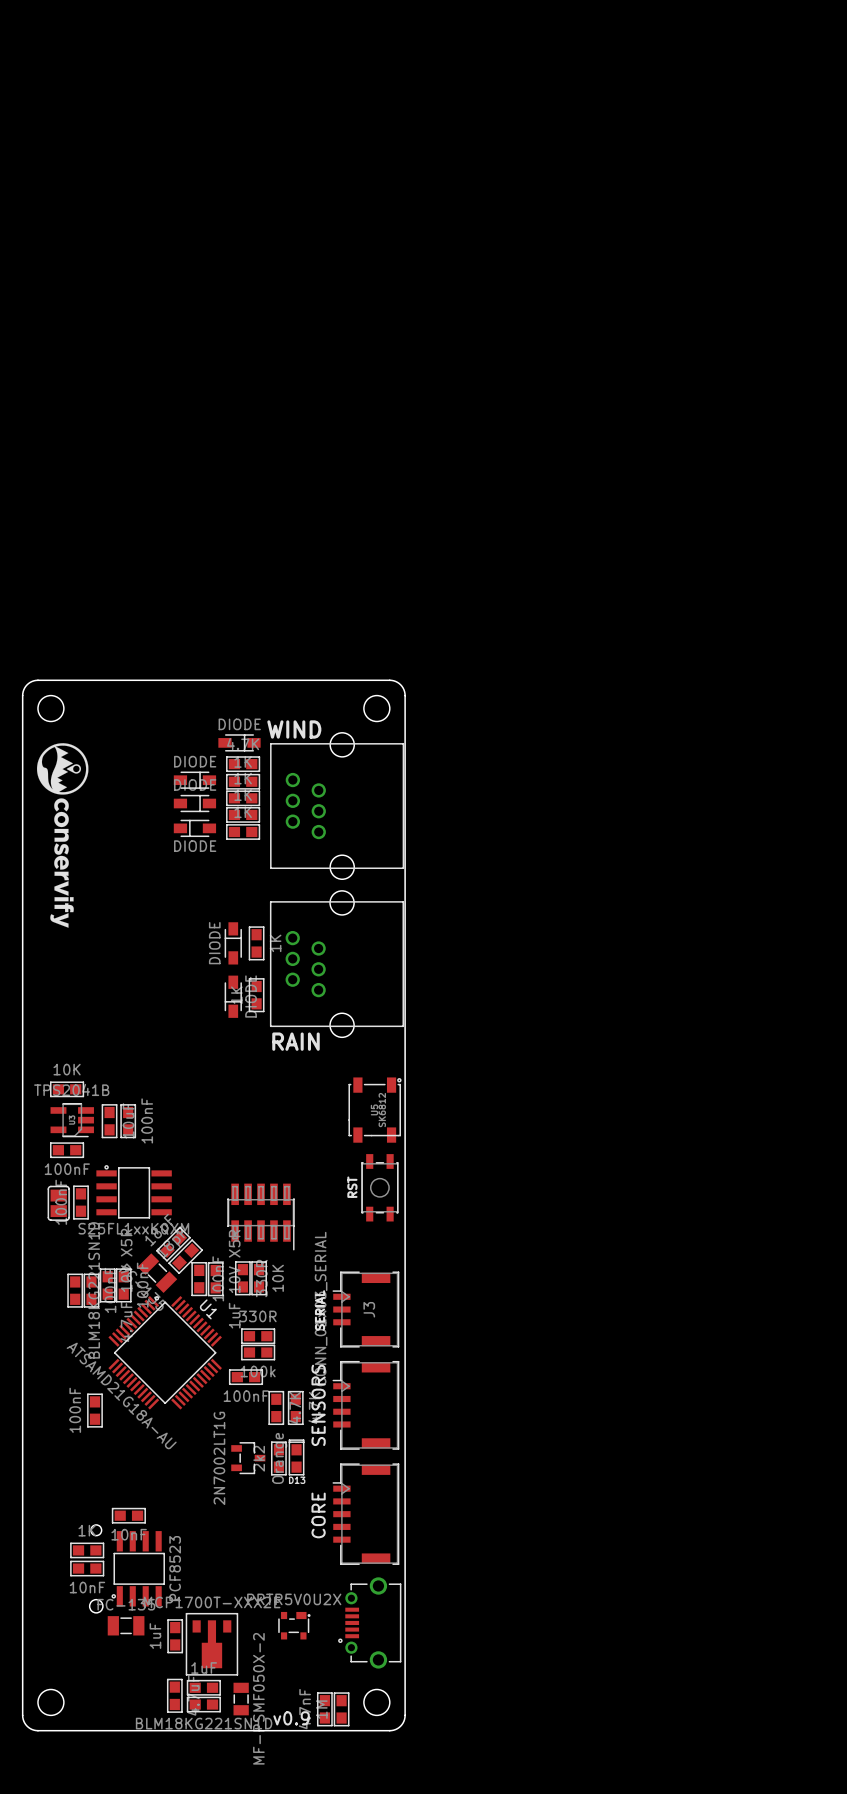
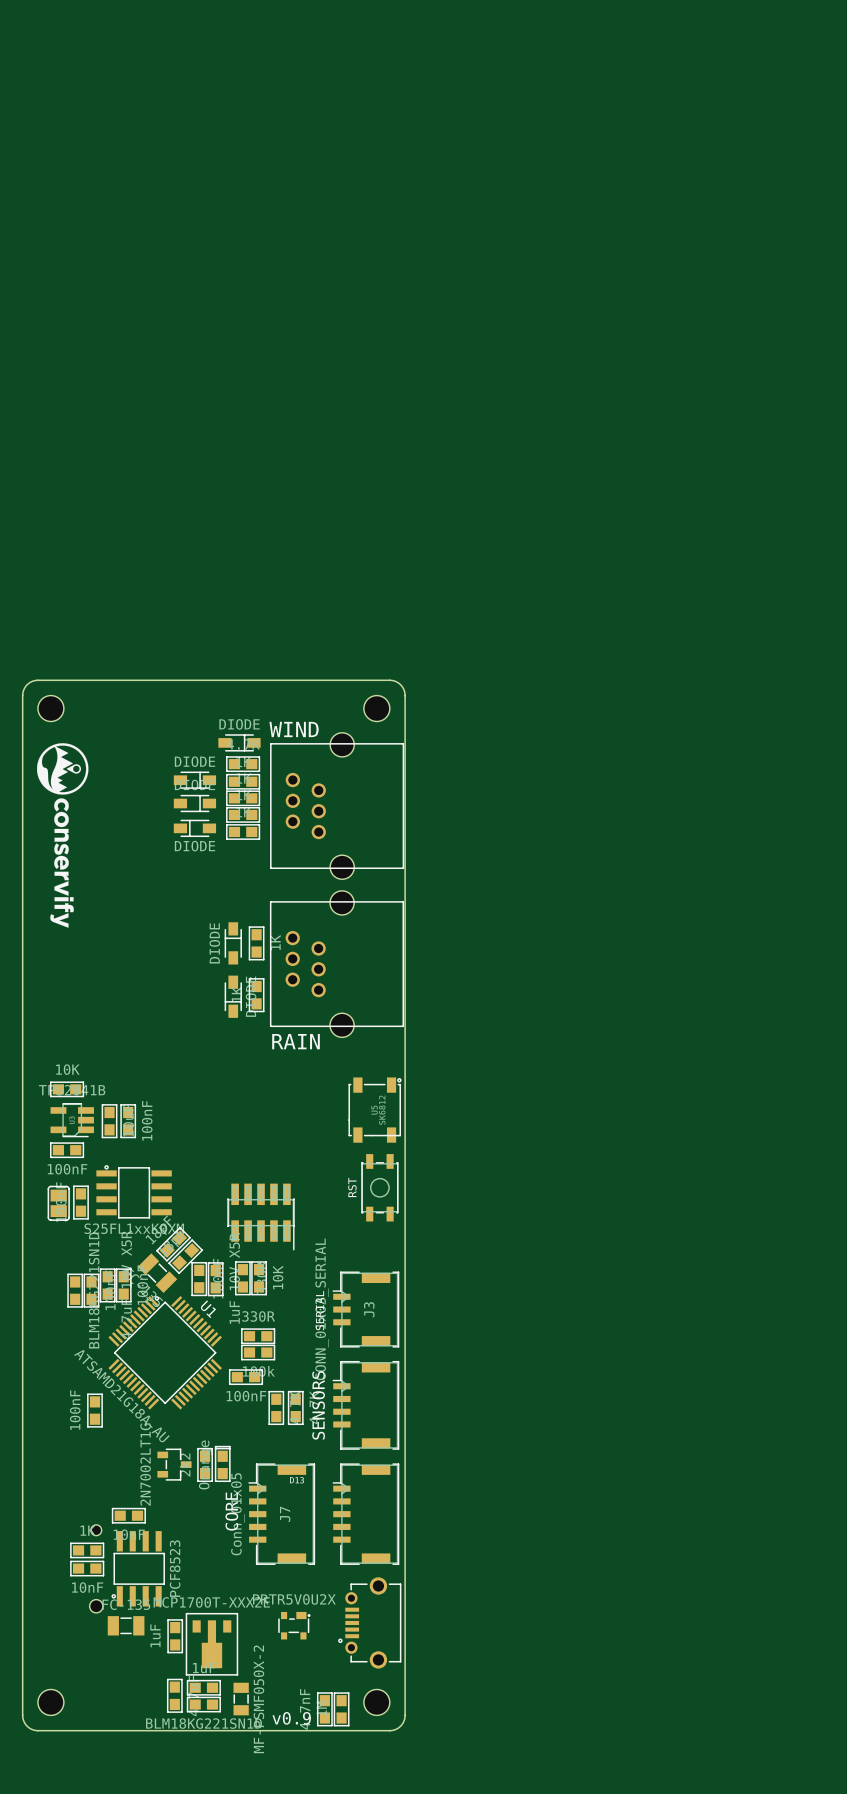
part position: (296, 1457) -> (222, 1463)
part position: (248, 1458) -> (174, 1464)
part position: (278, 1458) -> (205, 1464)
J7: none -> Conn_01x05 (281, 1514)
text position: CORE (318, 1515) -> CORE (231, 1511)

